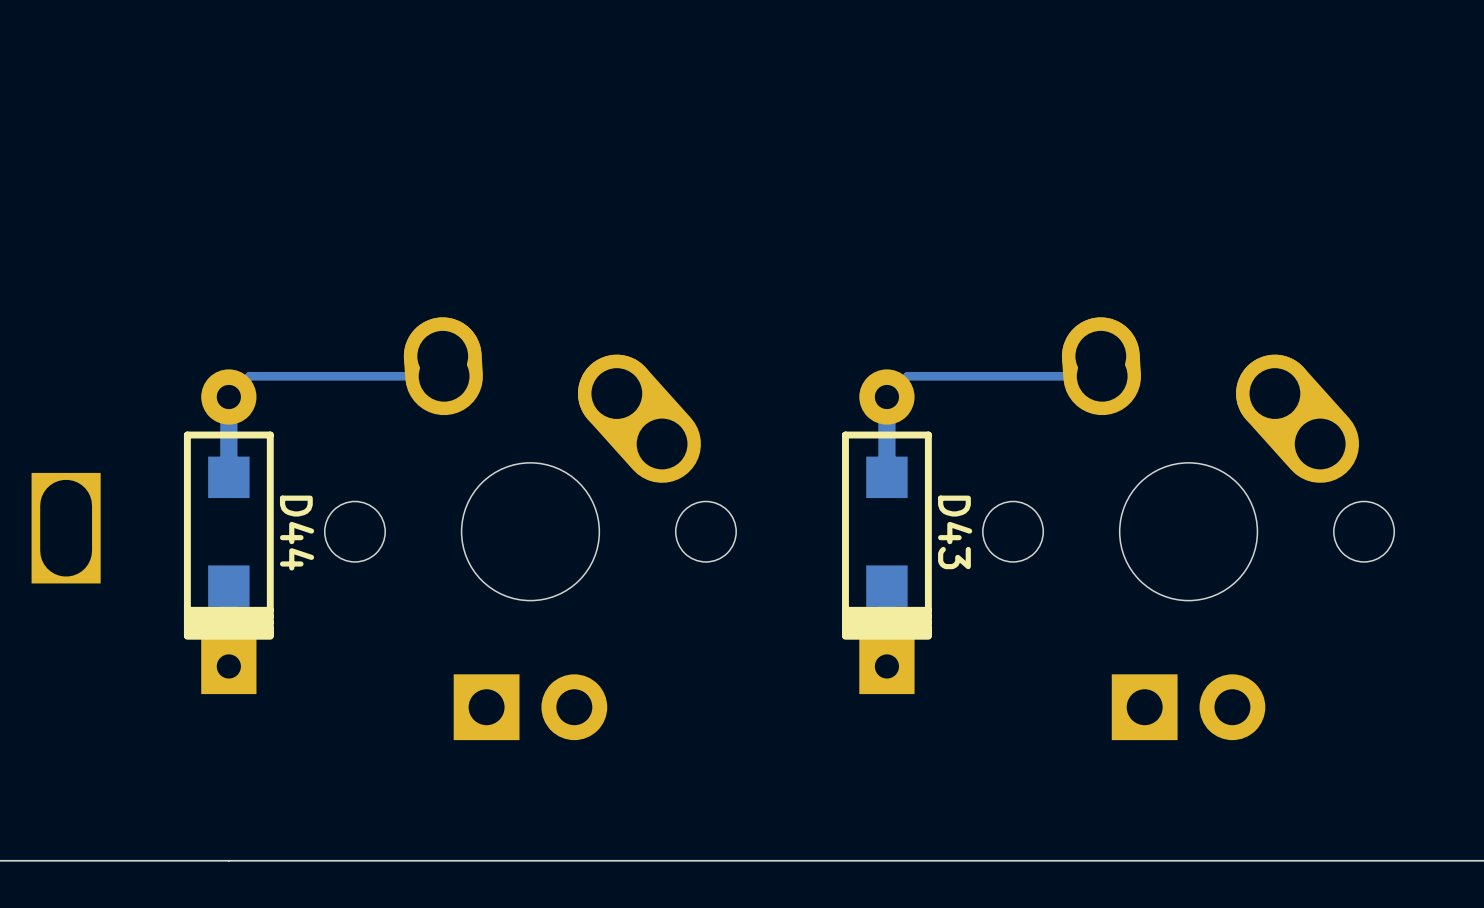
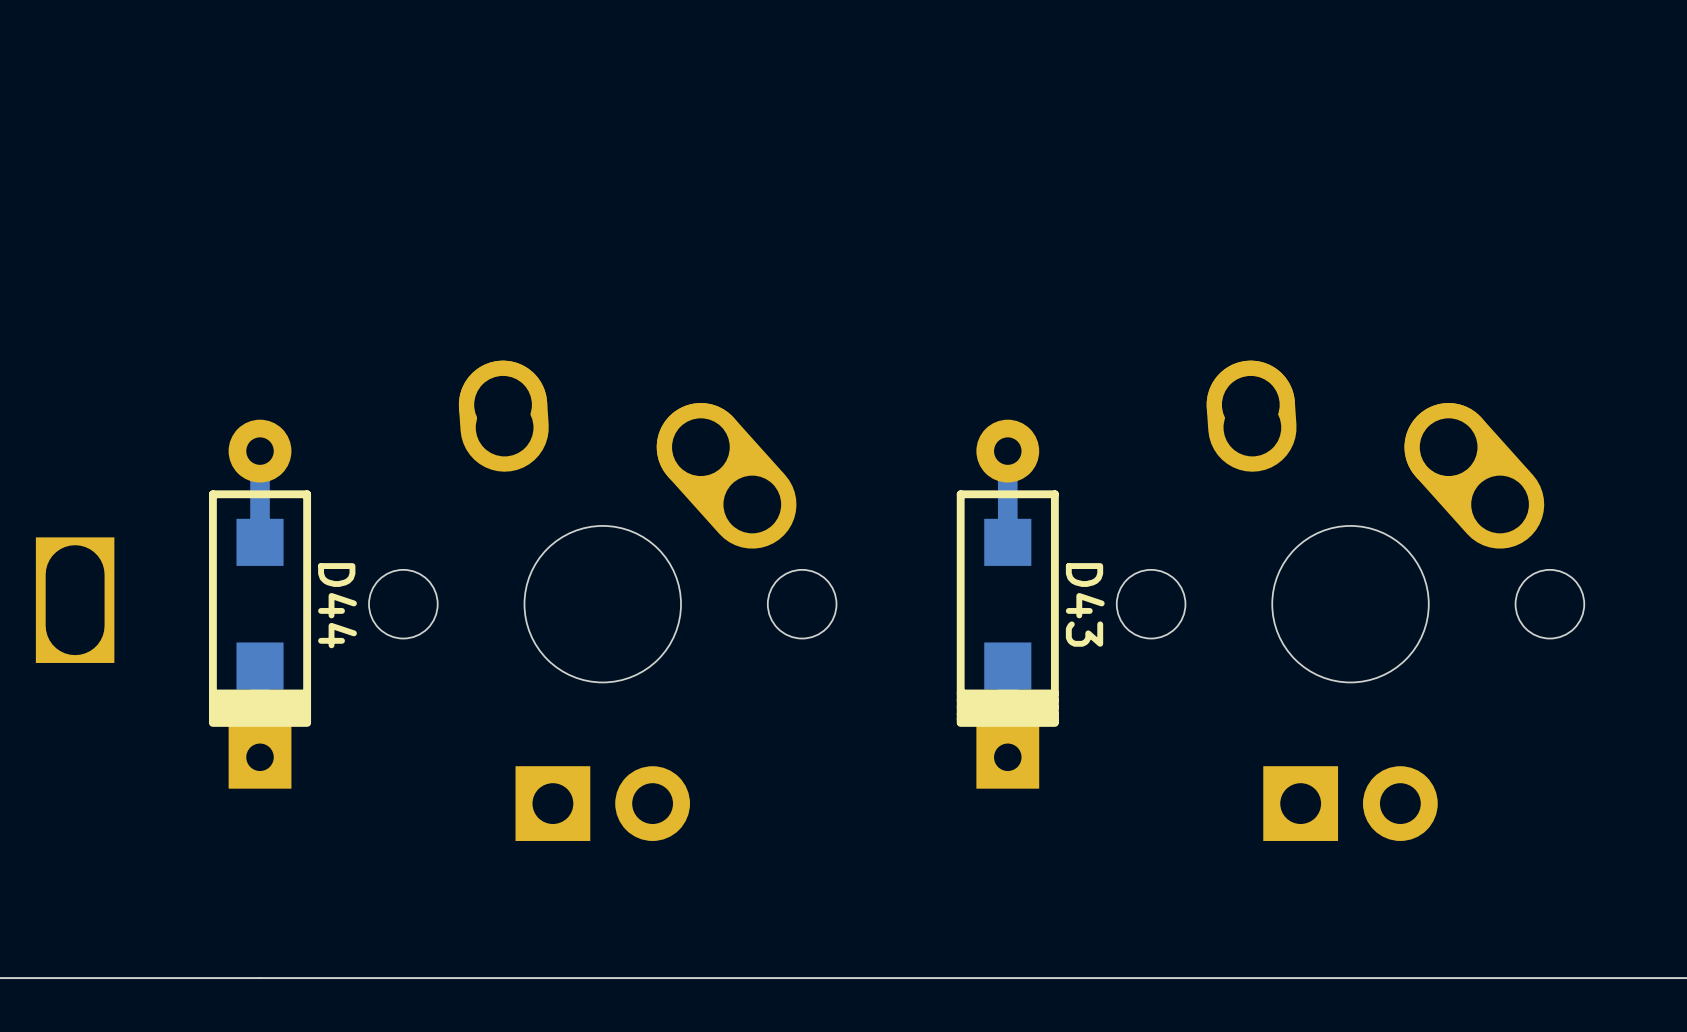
track: (444, 376) (249, 376) (228, 397) -> none
track: (1102, 376) (907, 376) (886, 397) -> none

